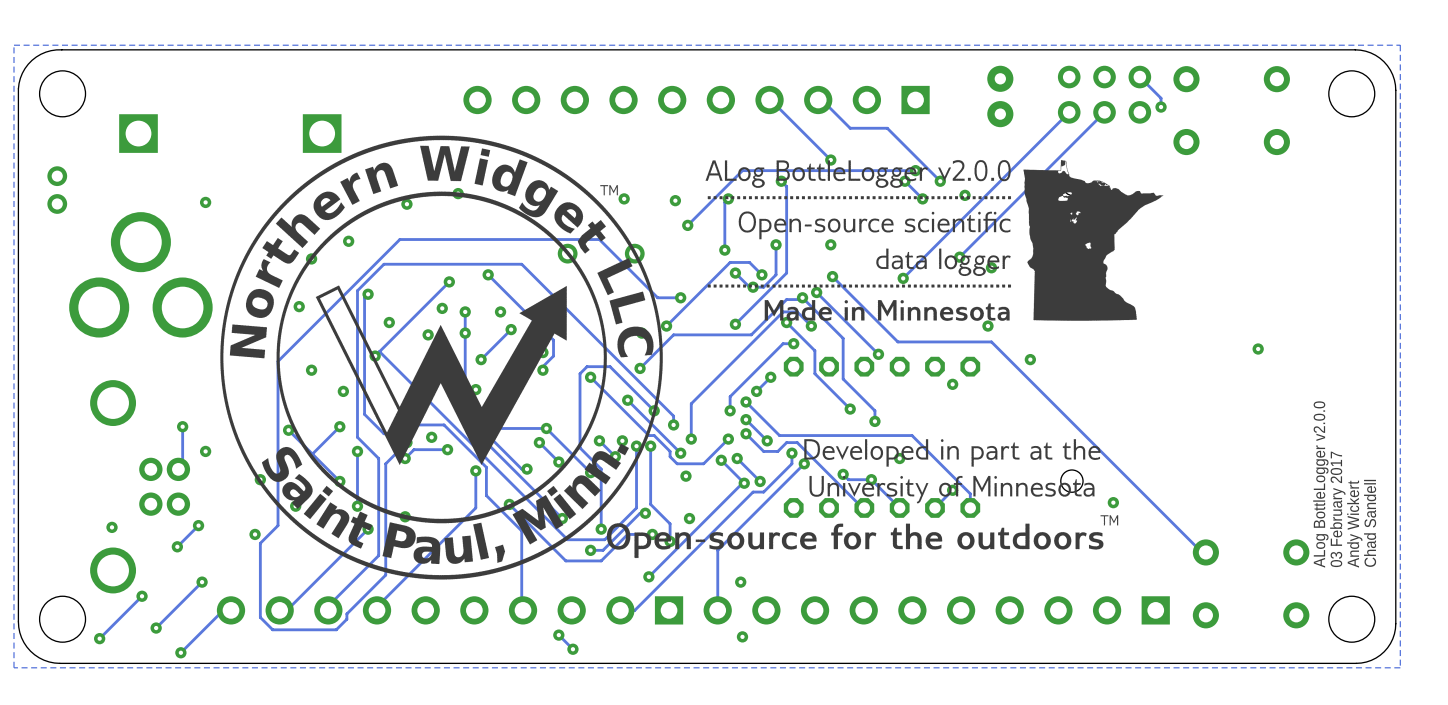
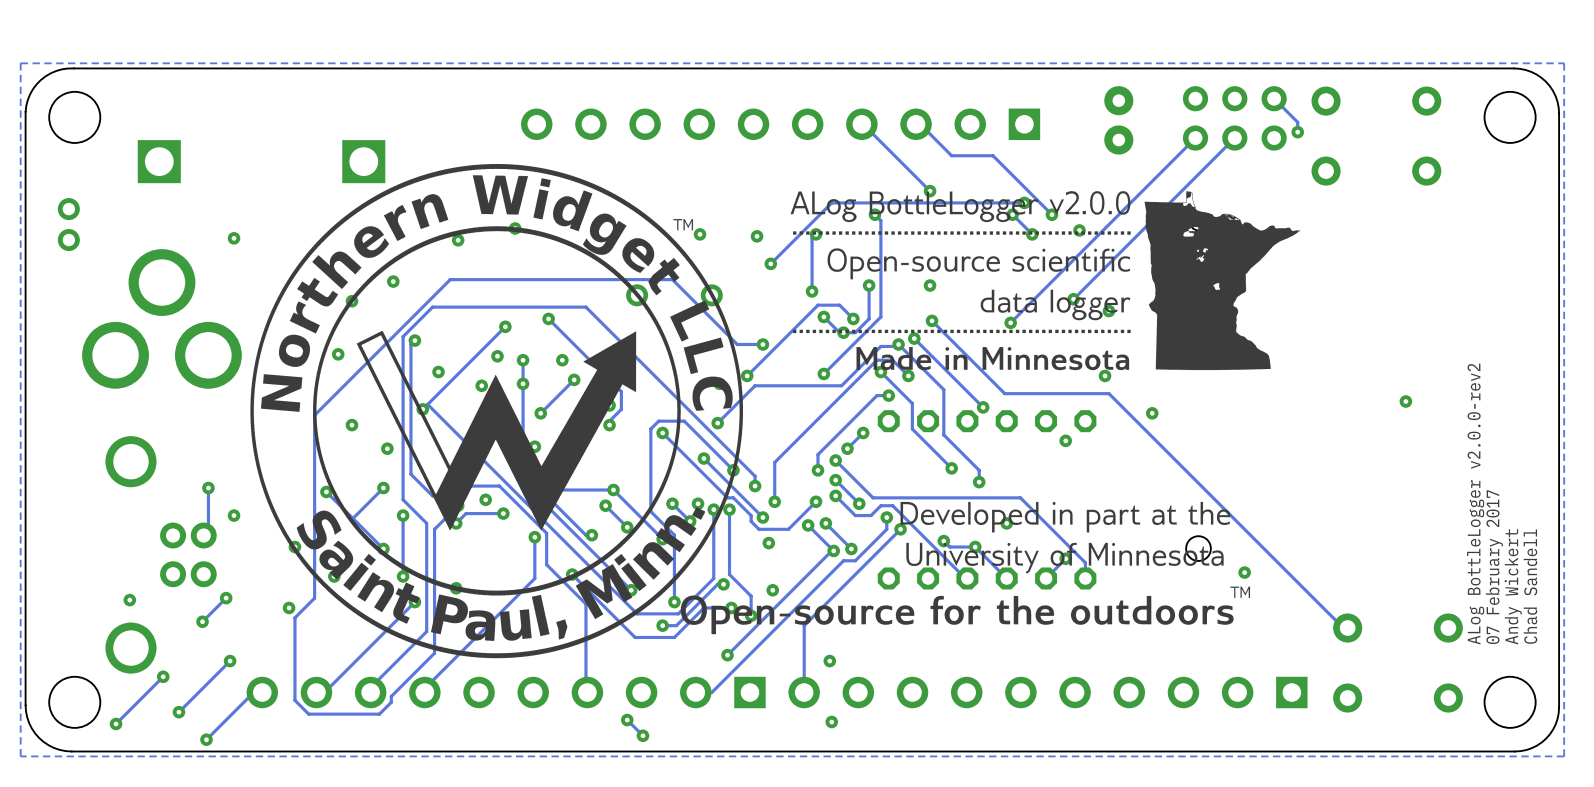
text: ALog BottleLogger v2.0.0 (1320, 484) -> ALog BottleLogger v2.0.0-rev2 (1475, 504)
text: 03 February 2017 (1337, 509) -> 07 February 2017 (1494, 567)

